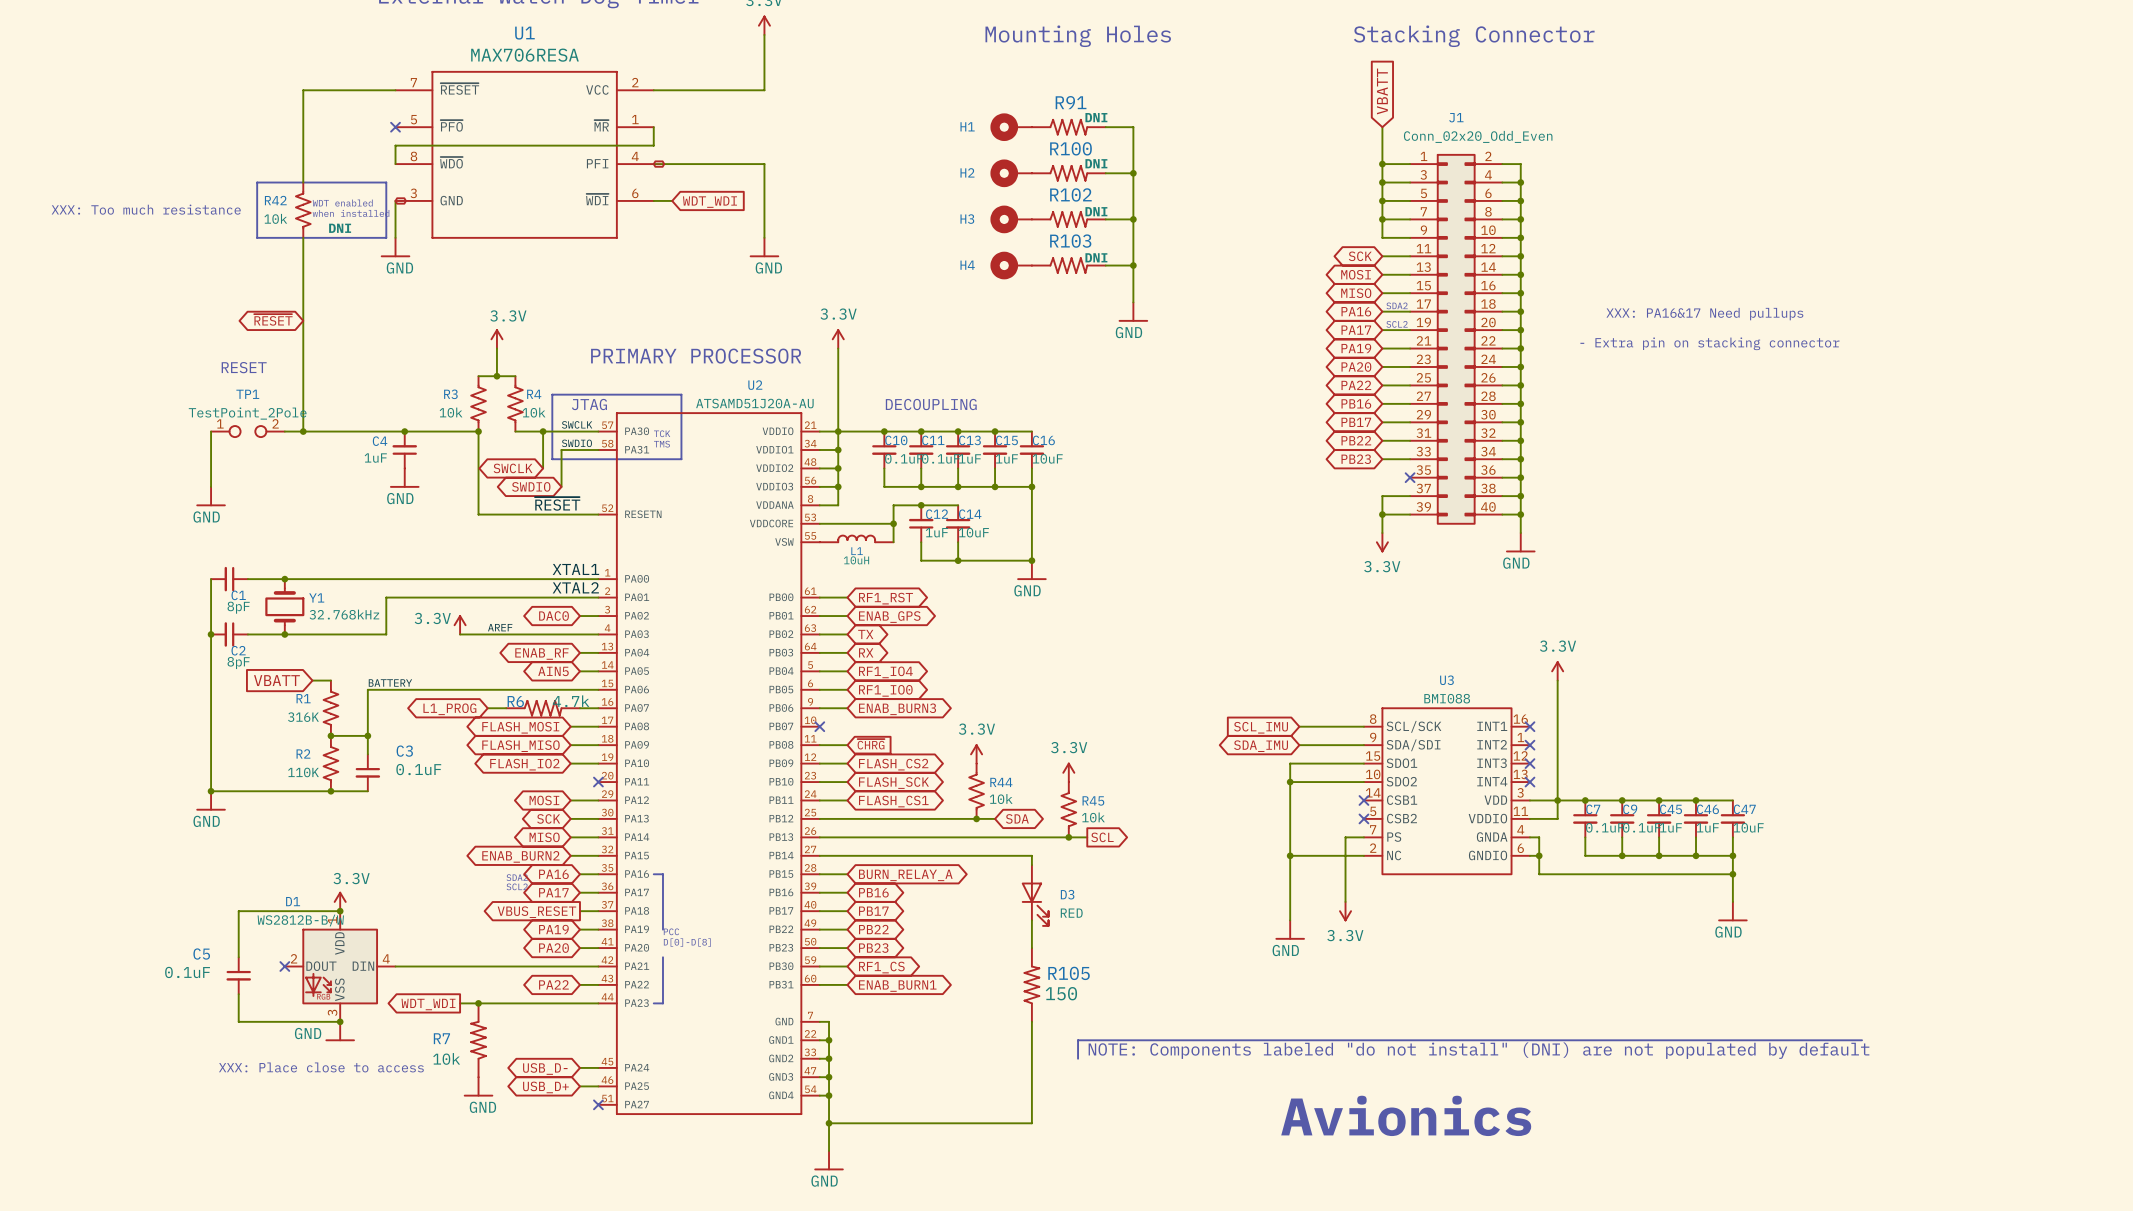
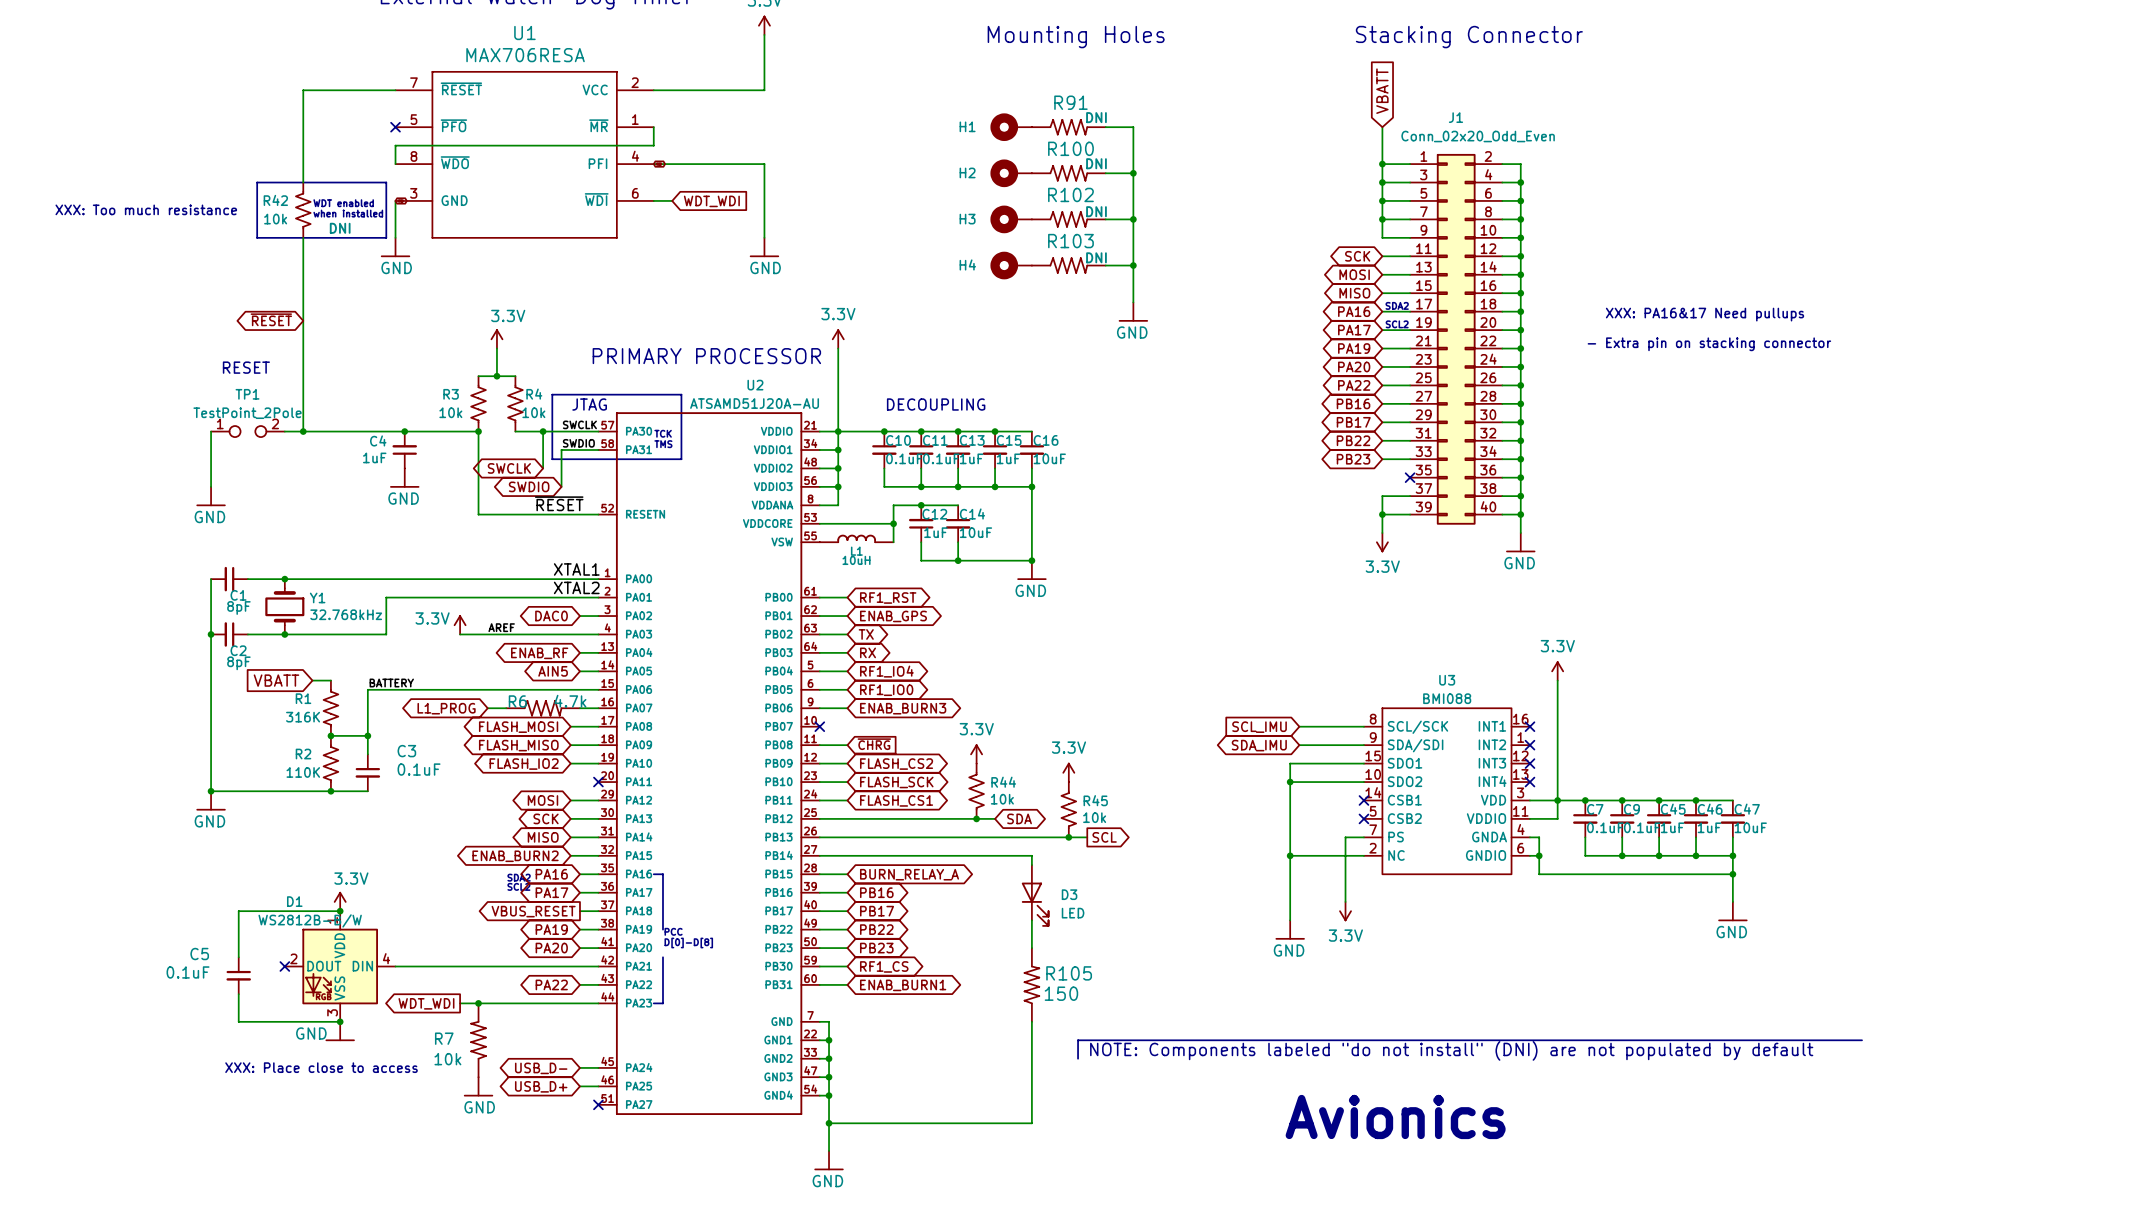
D3 value: RED (1071, 913) -> LED (1073, 913)

